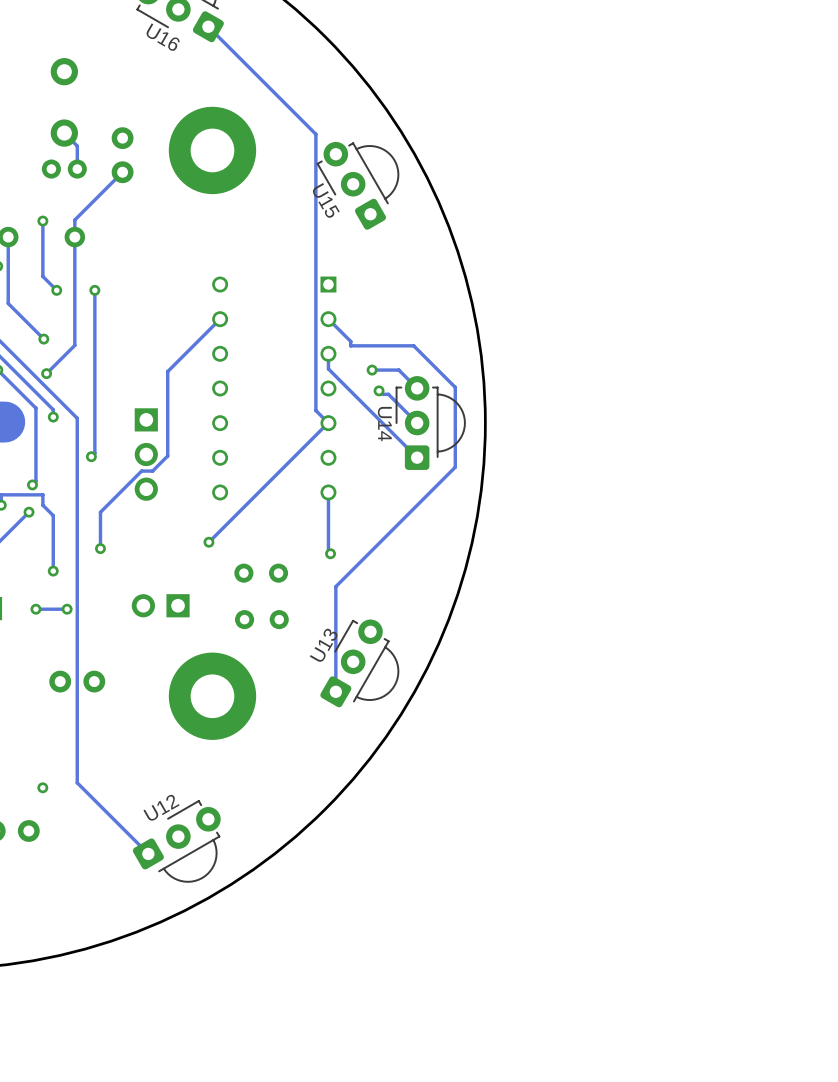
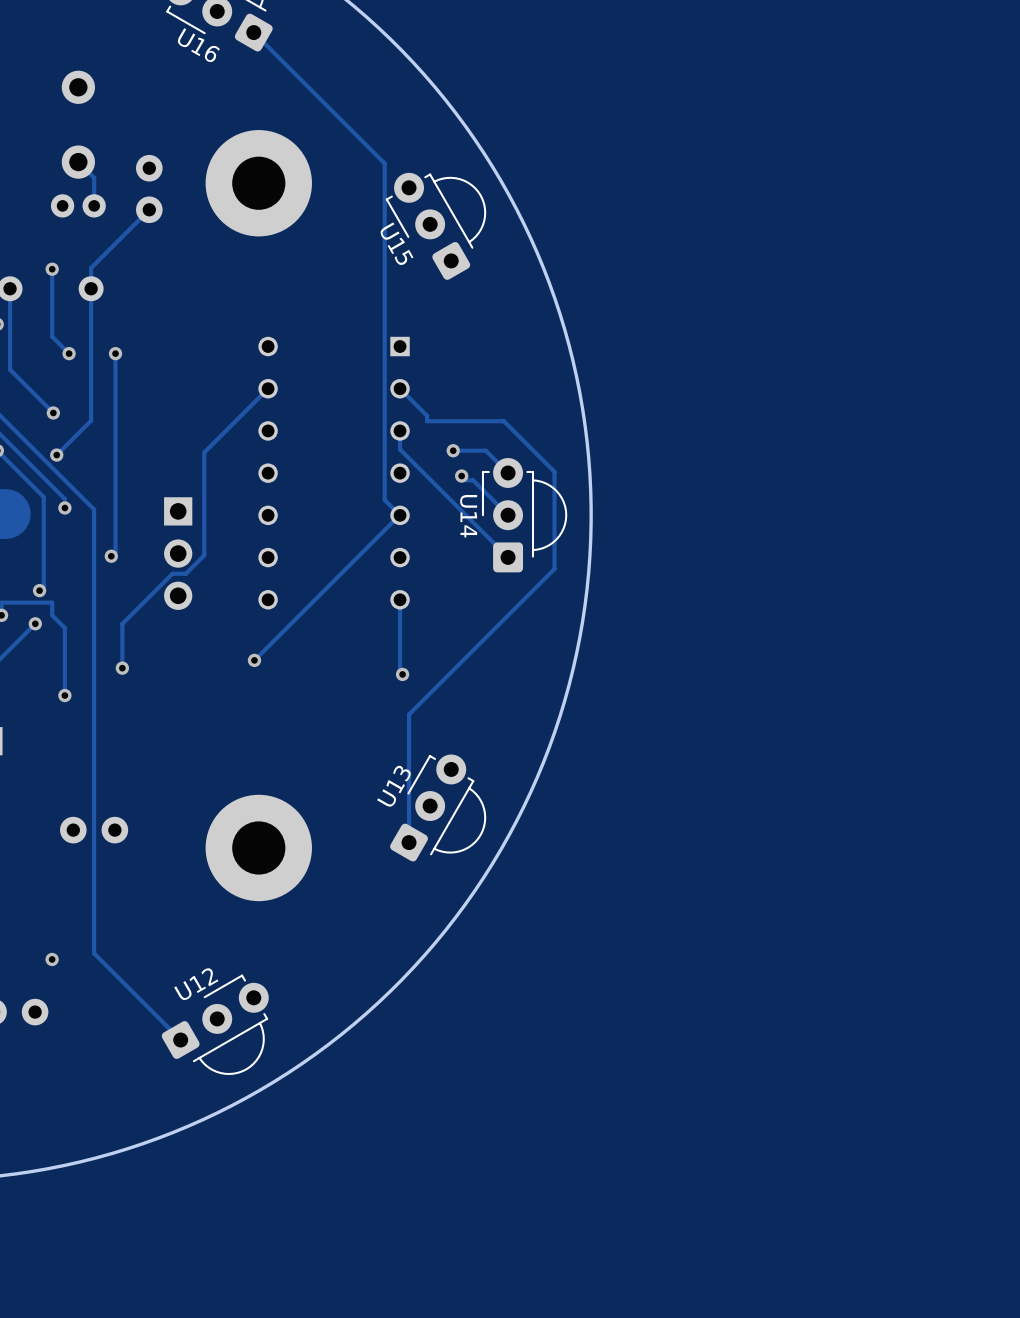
part: (261, 573) -> none
part: (160, 605) -> none
via: (35, 609) -> none
track: (67, 609) (35, 609) -> none
via: (67, 609) -> none
part: (261, 619) -> none

